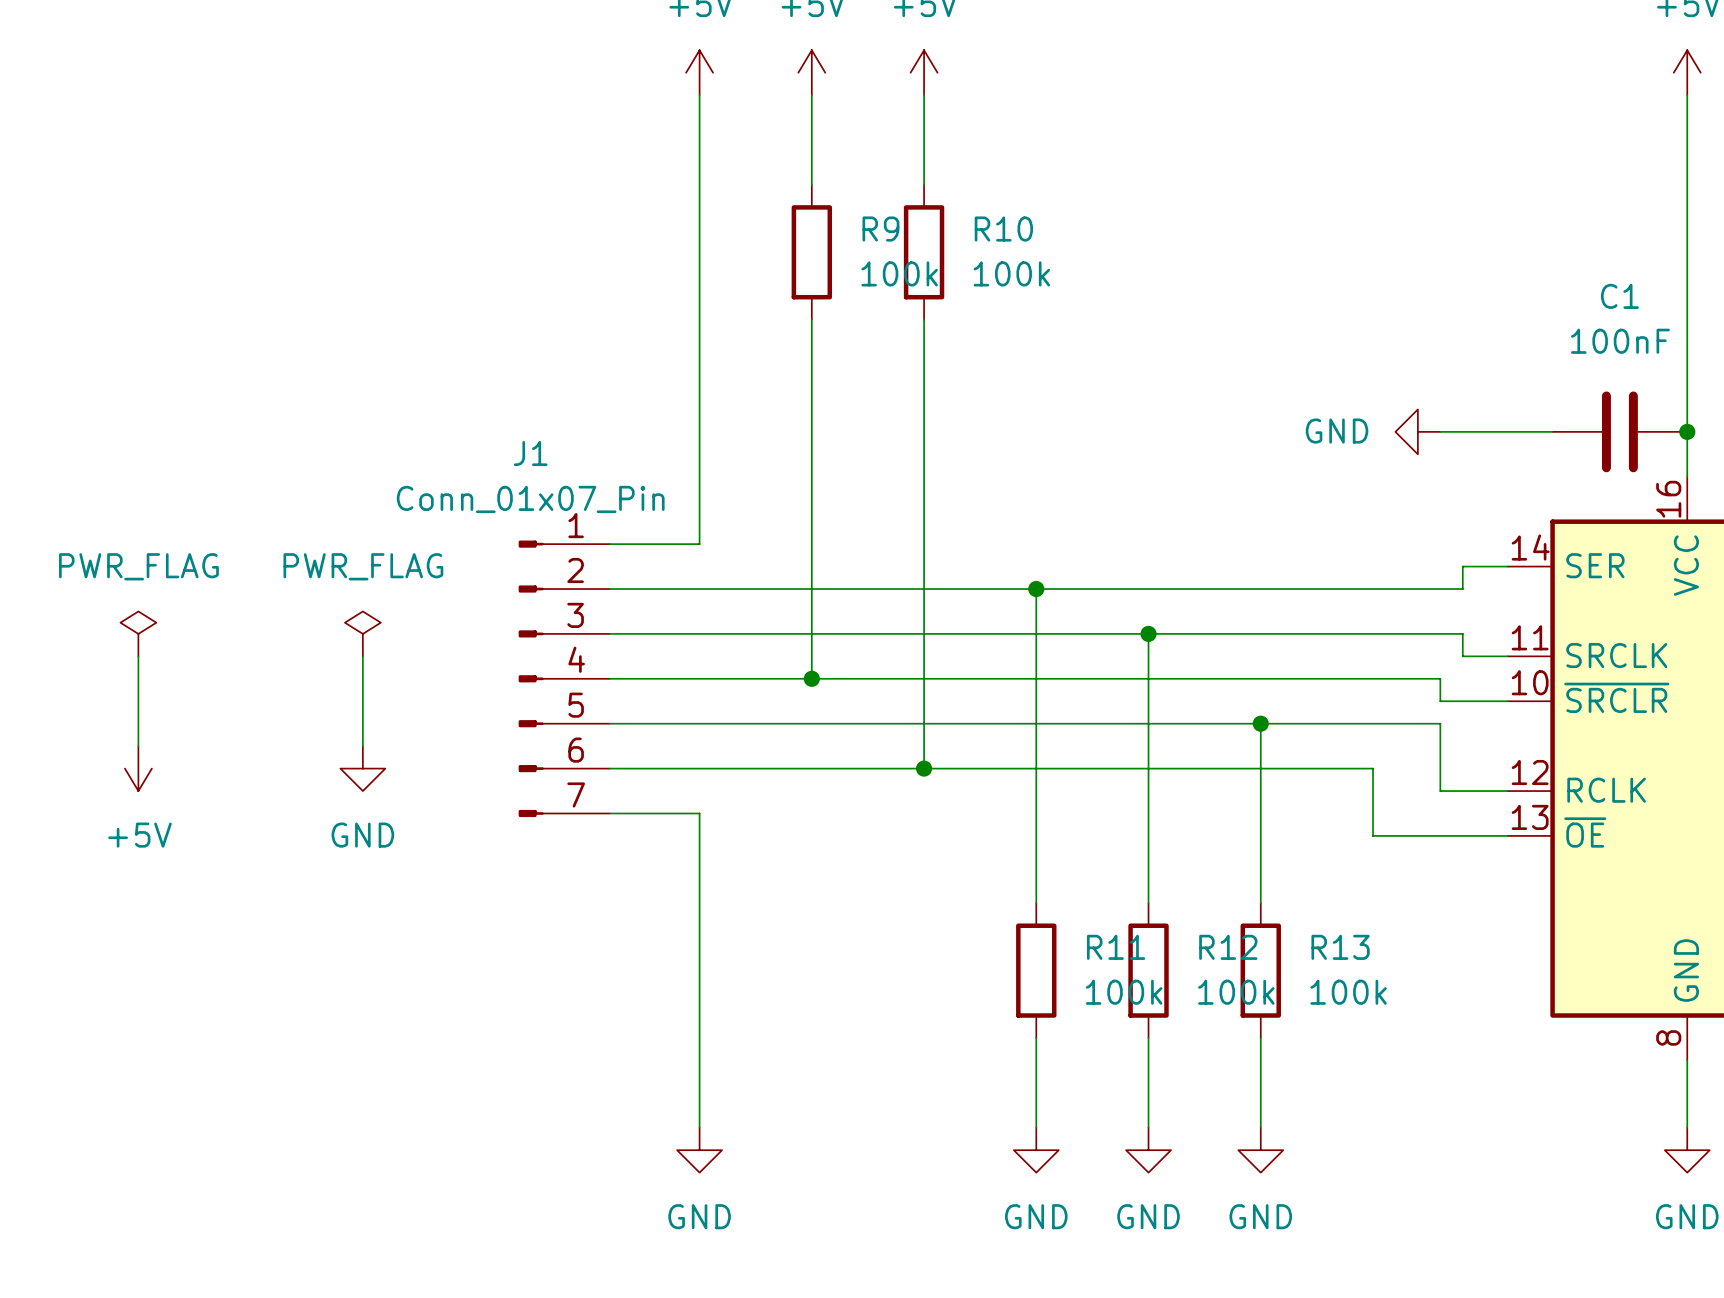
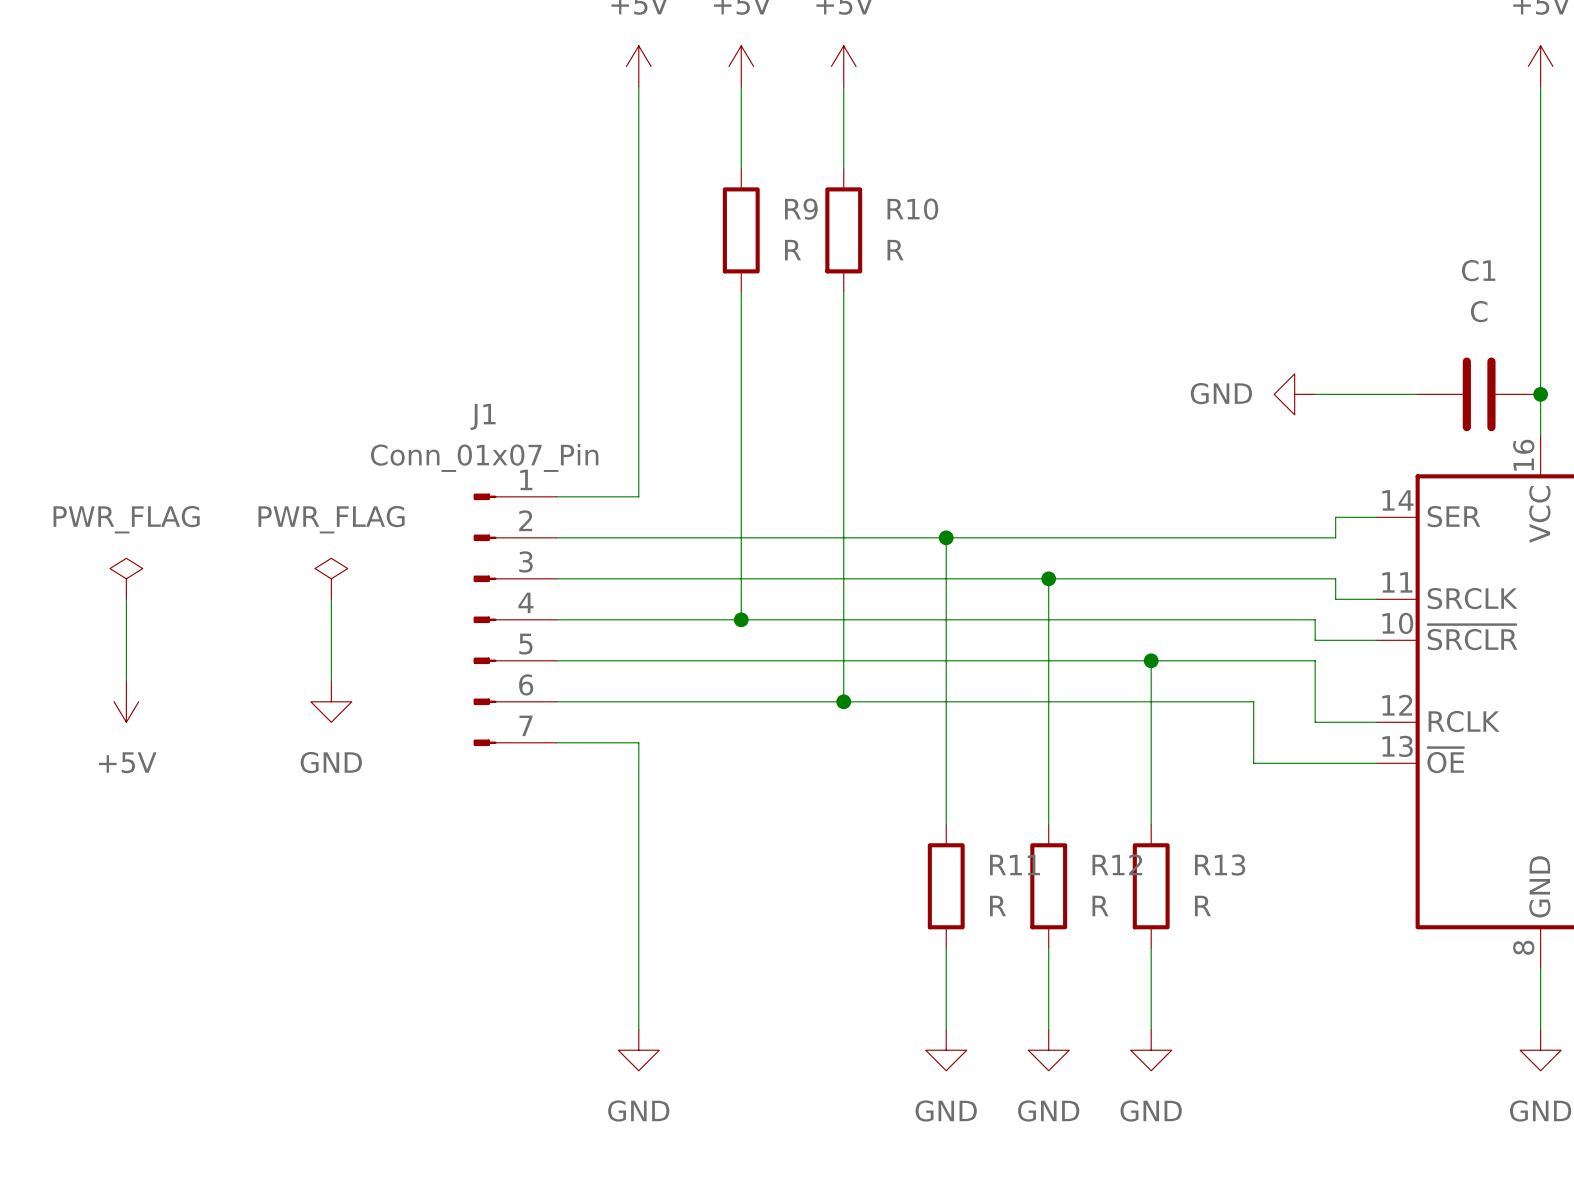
R9 value: 100k (899, 273) -> R (793, 250)
R10 value: 100k (1011, 273) -> R (895, 250)
C1 value: 100nF (1620, 341) -> C (1479, 311)
R11 value: 100k (1124, 992) -> R (997, 906)
R12 value: 100k (1236, 992) -> R (1100, 906)
R13 value: 100k (1348, 992) -> R (1202, 906)

